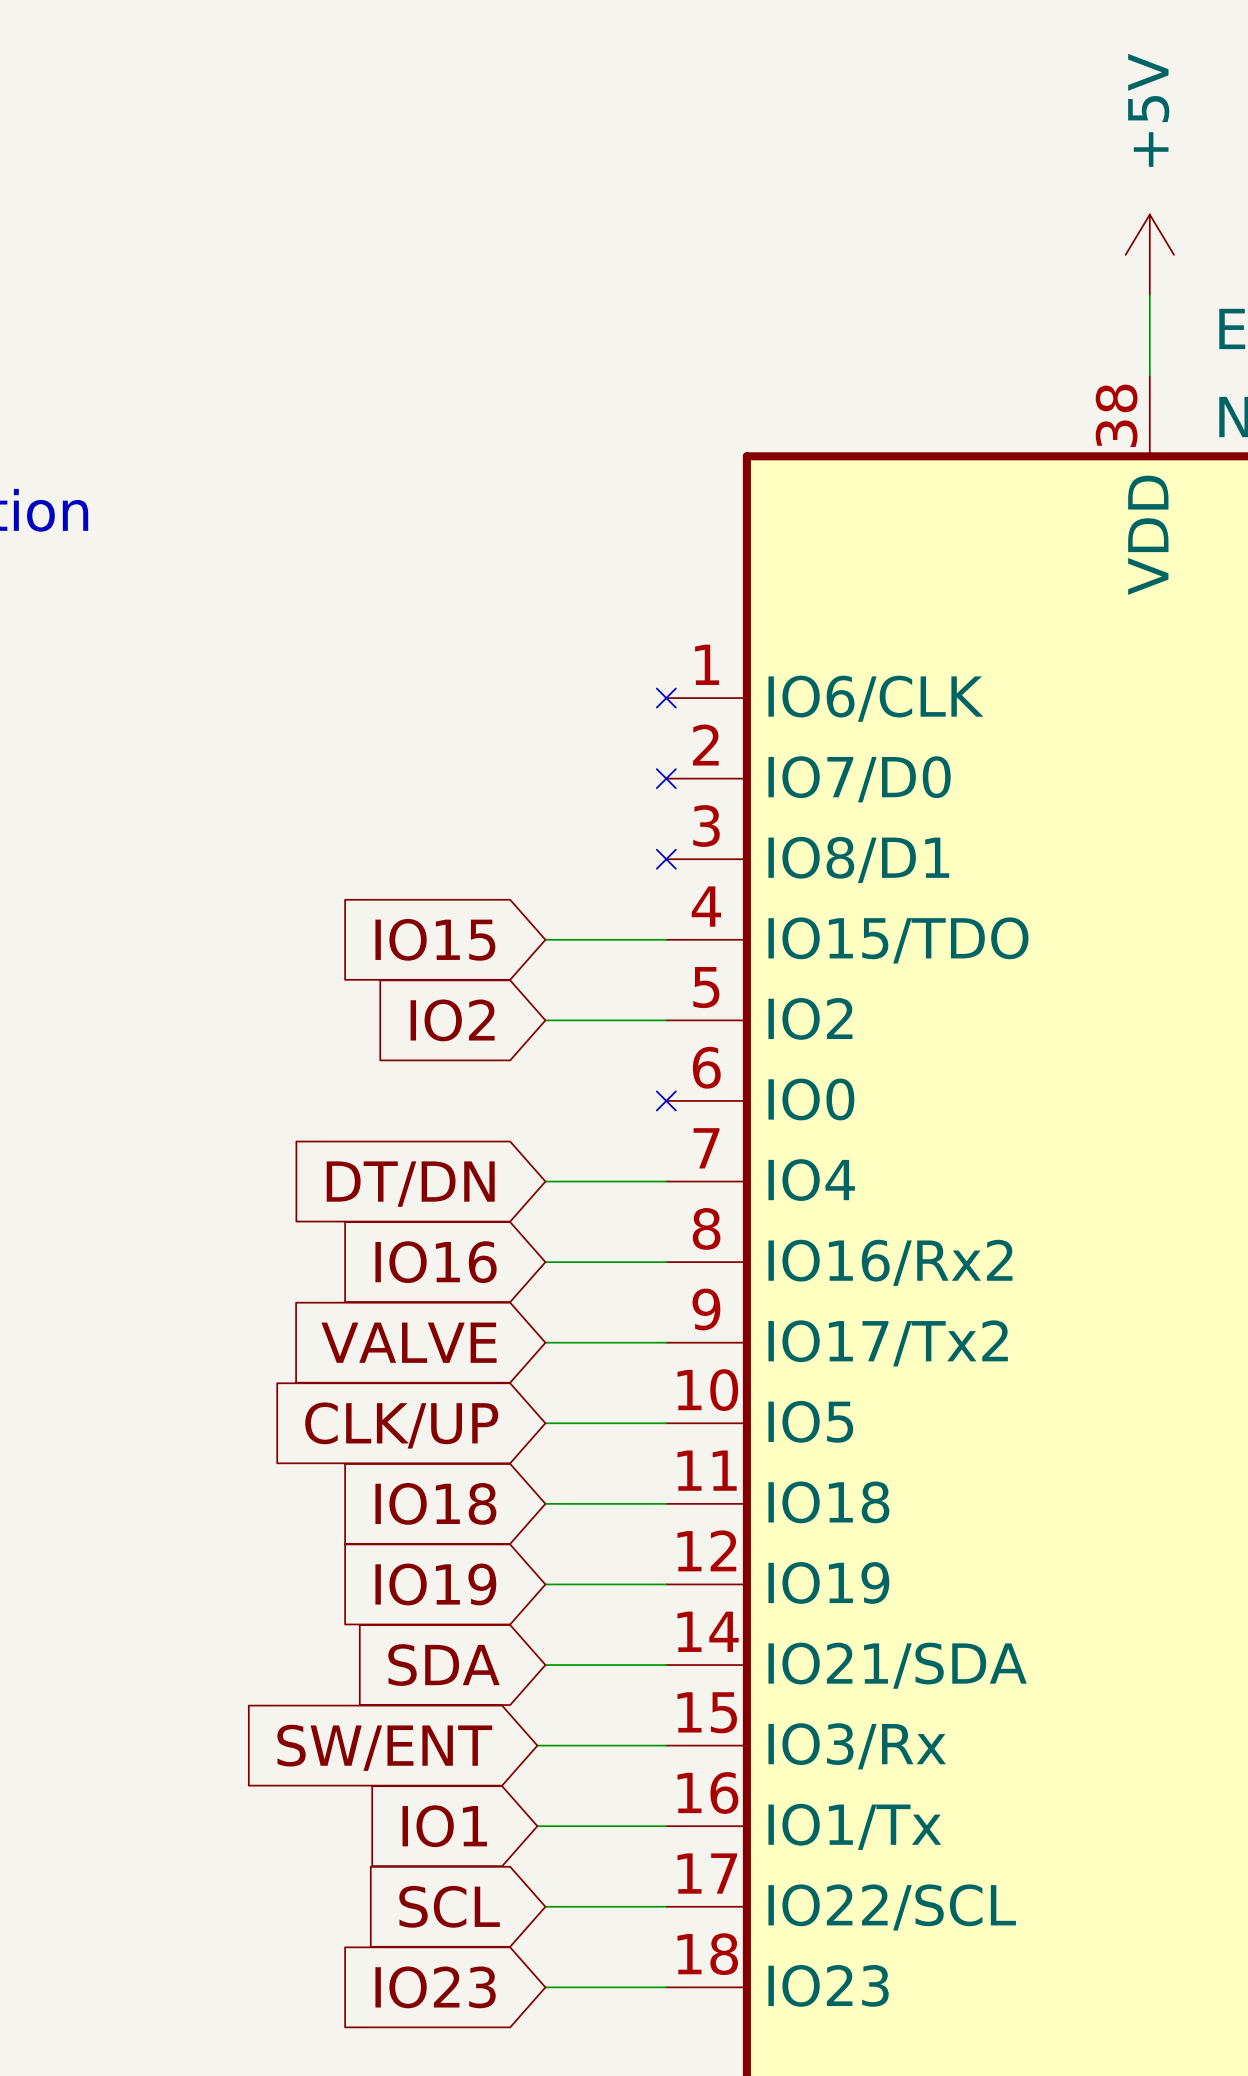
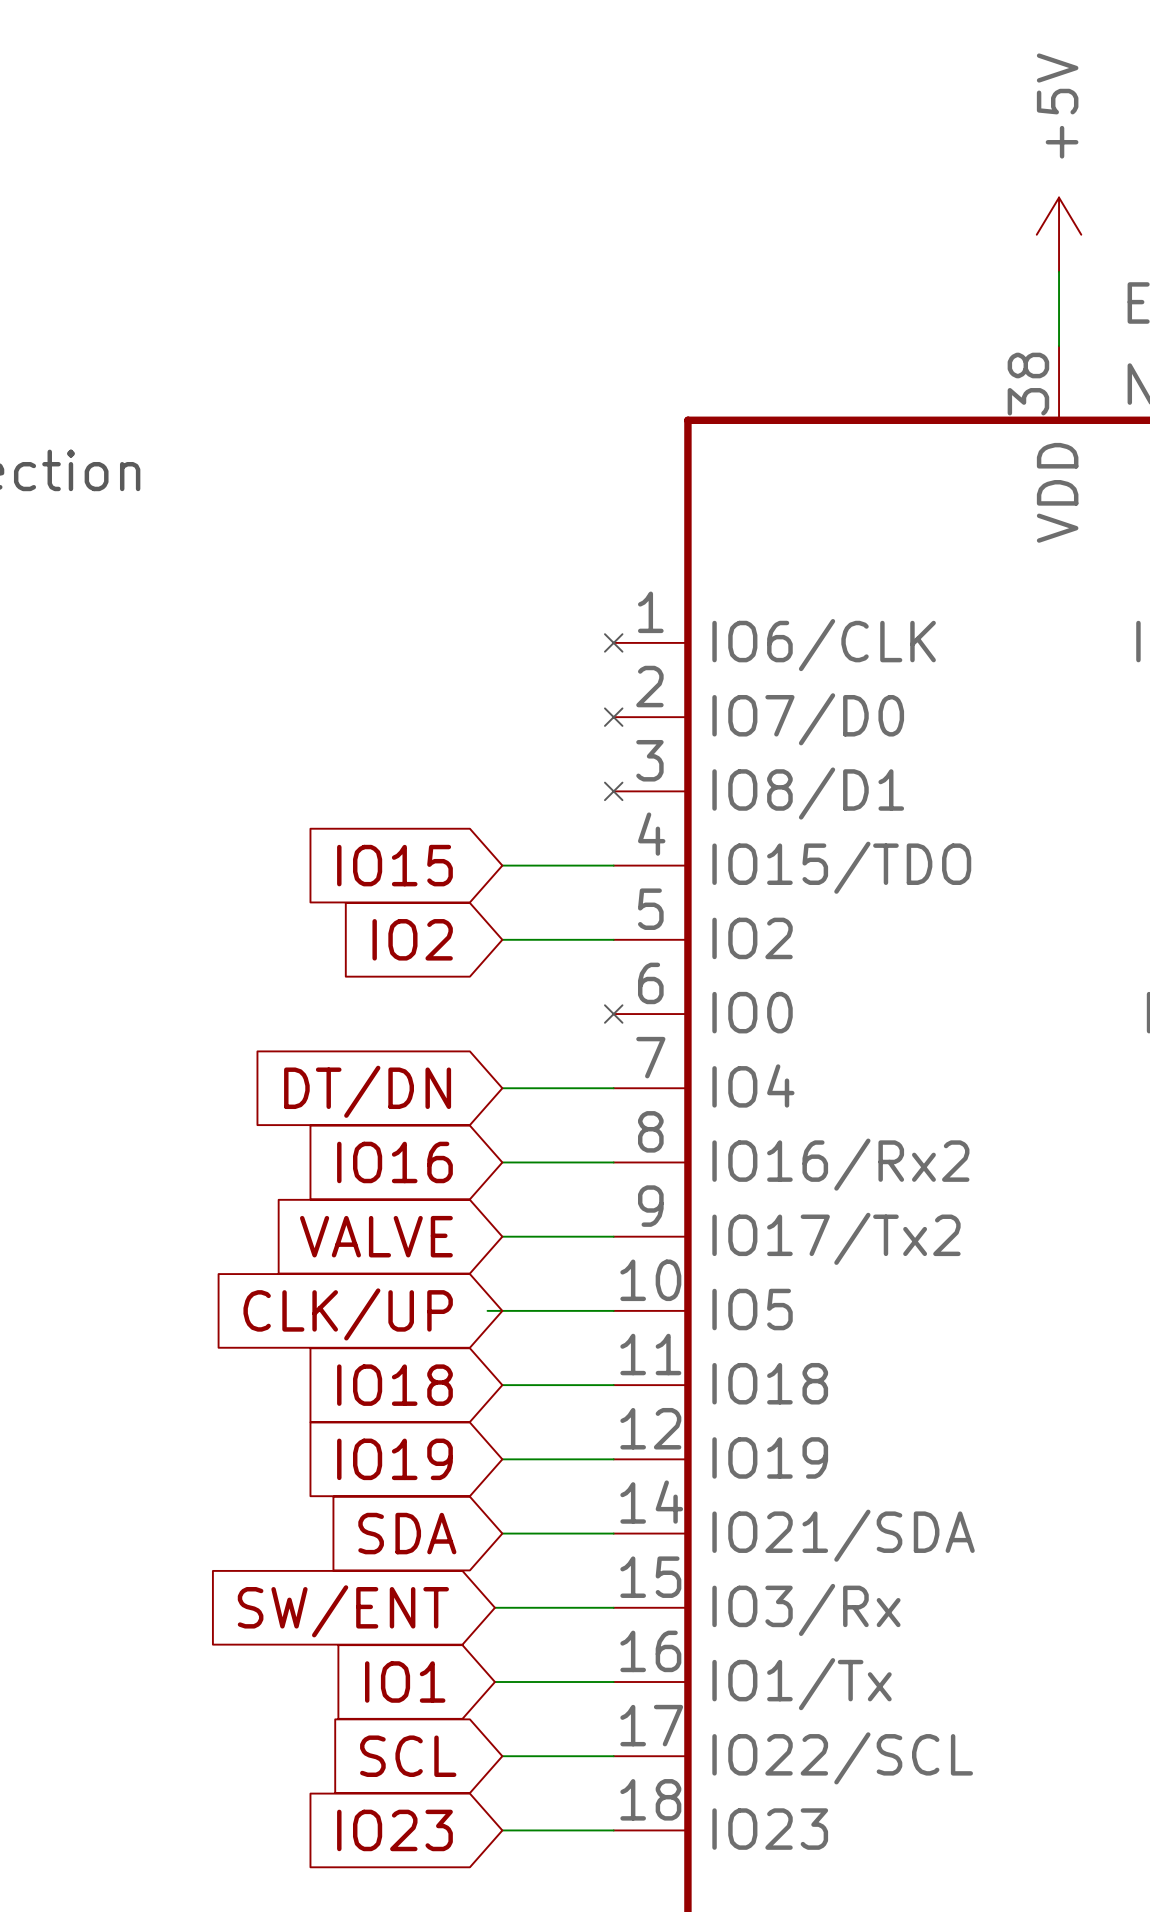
wire: none -> (487, 1310) (502, 1310)

